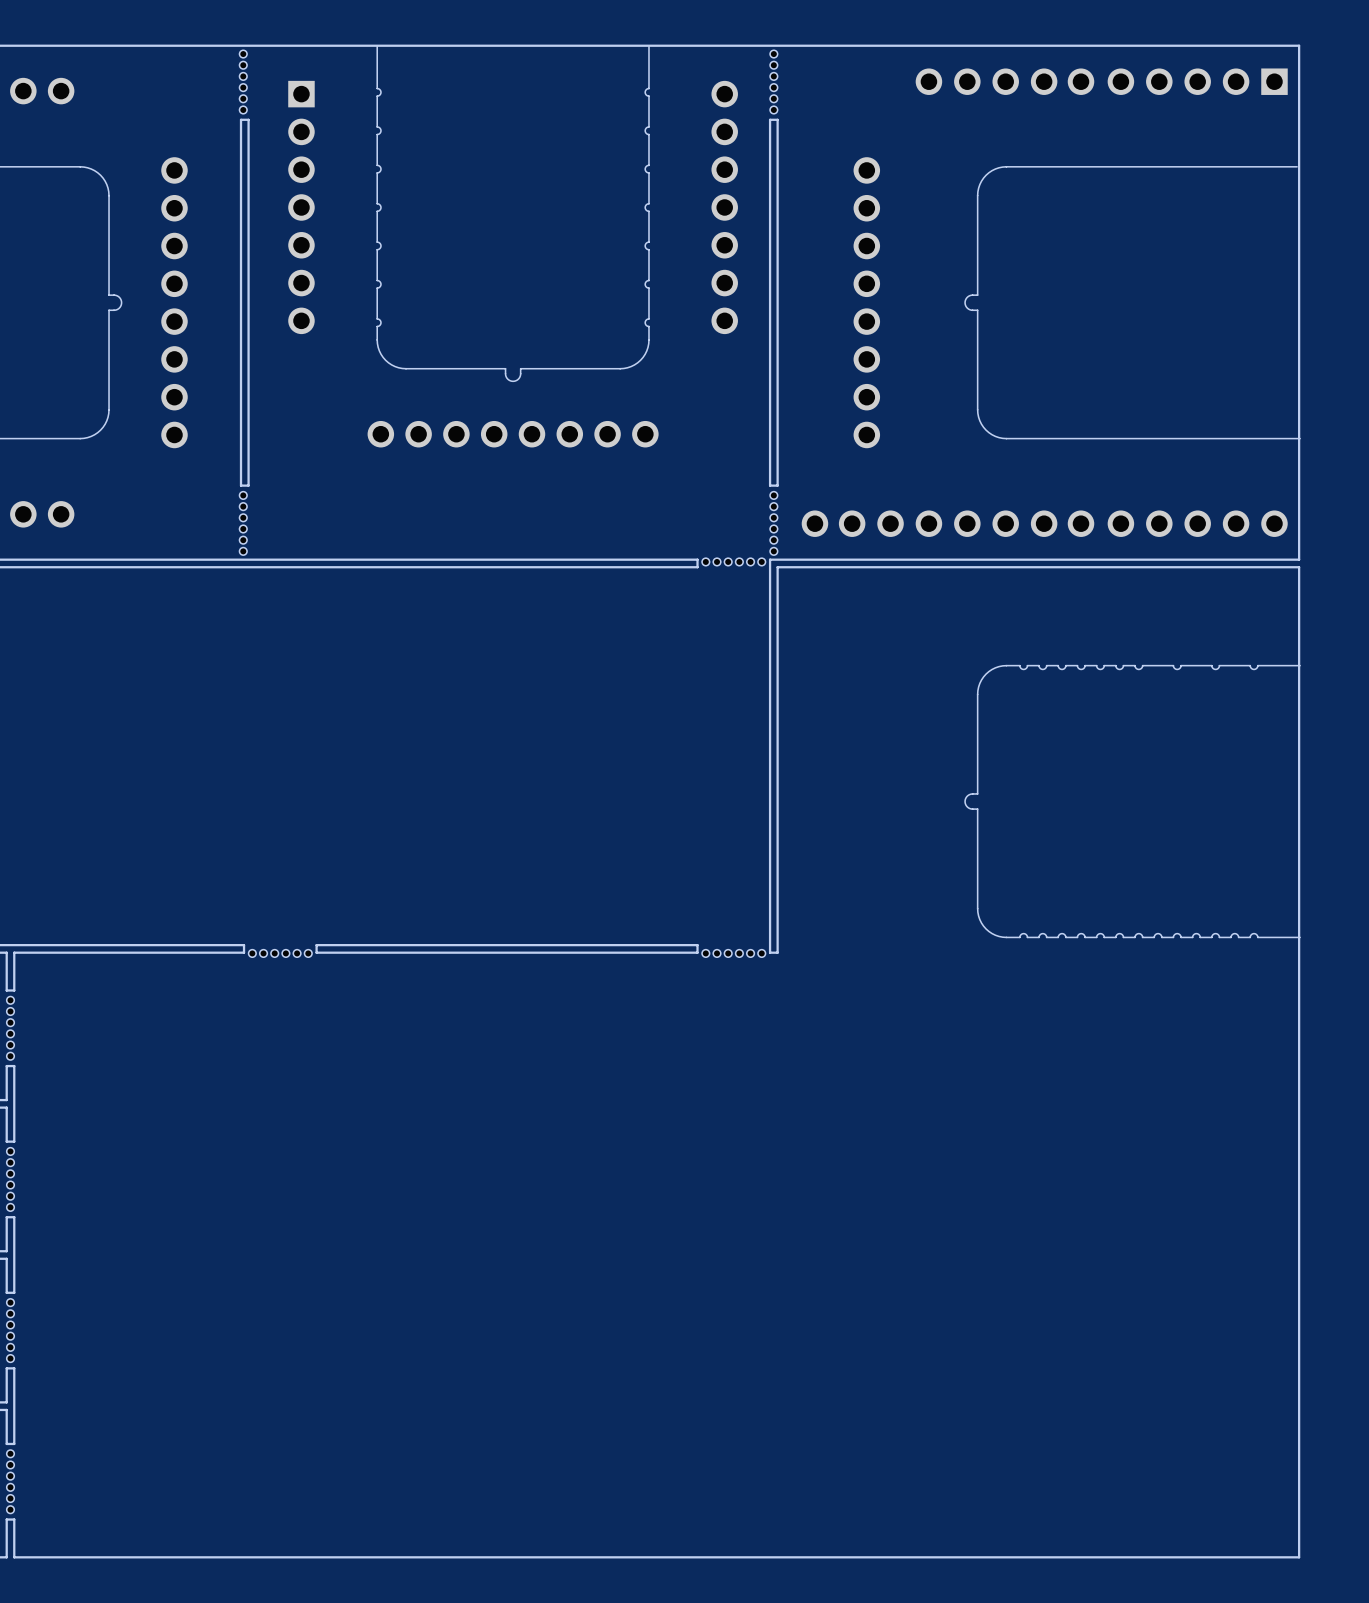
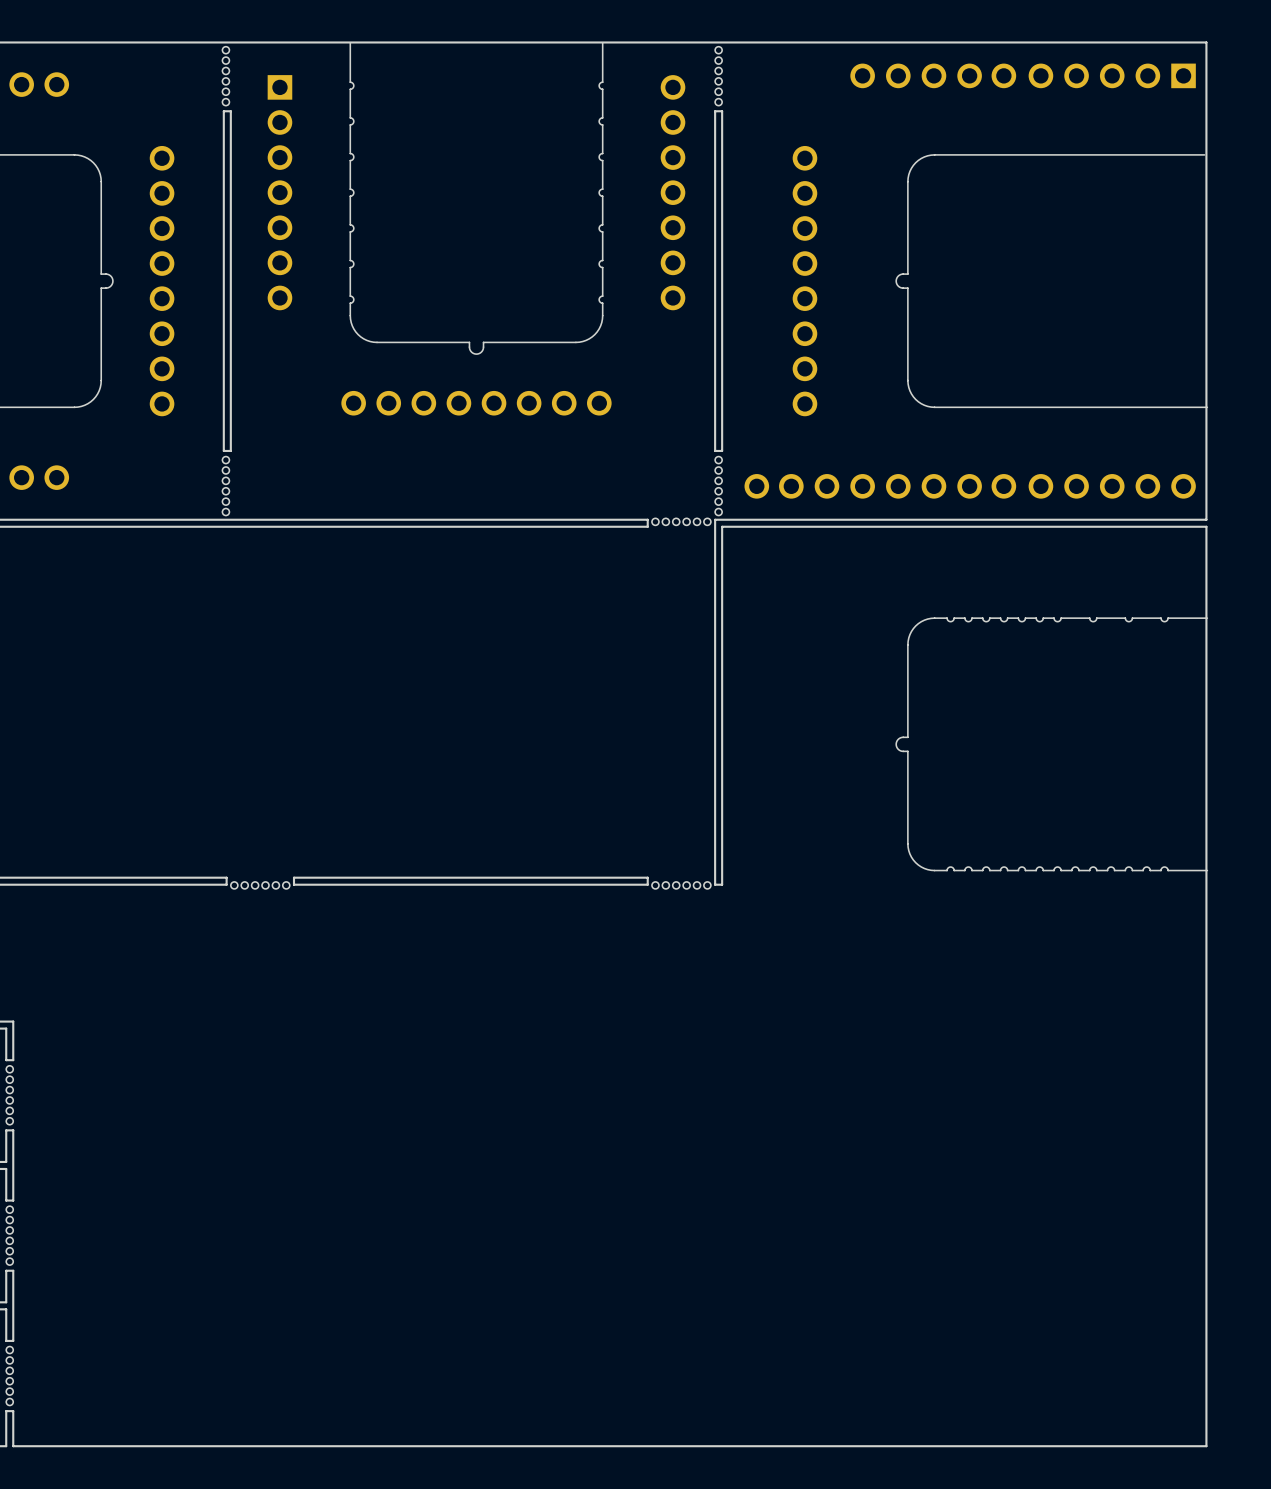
board edge: (14, 952) (14, 990) (6, 990) (6, 952) -> (13, 884) (6, 884)
part: (10, 1028) -> none
board edge: (14, 1100) (14, 1066) (6, 1066) (6, 1100) -> (13, 1021) (6, 1021)

